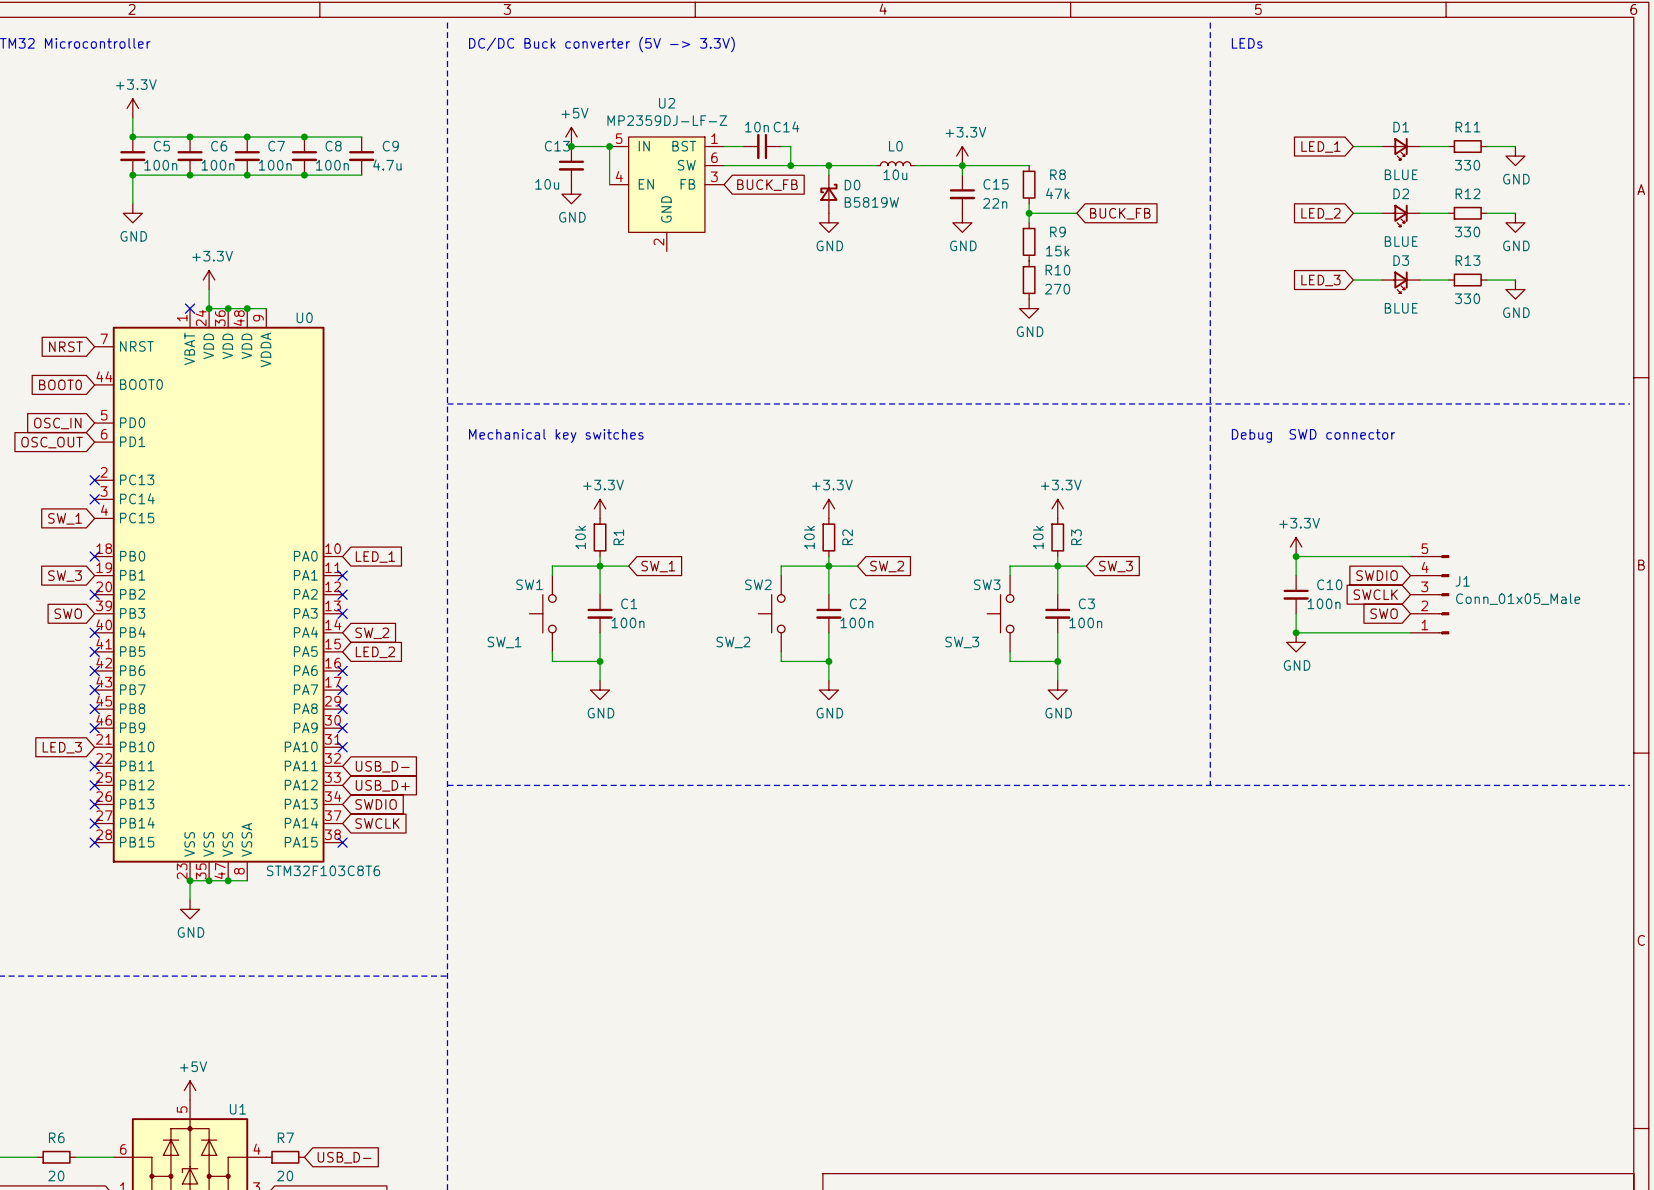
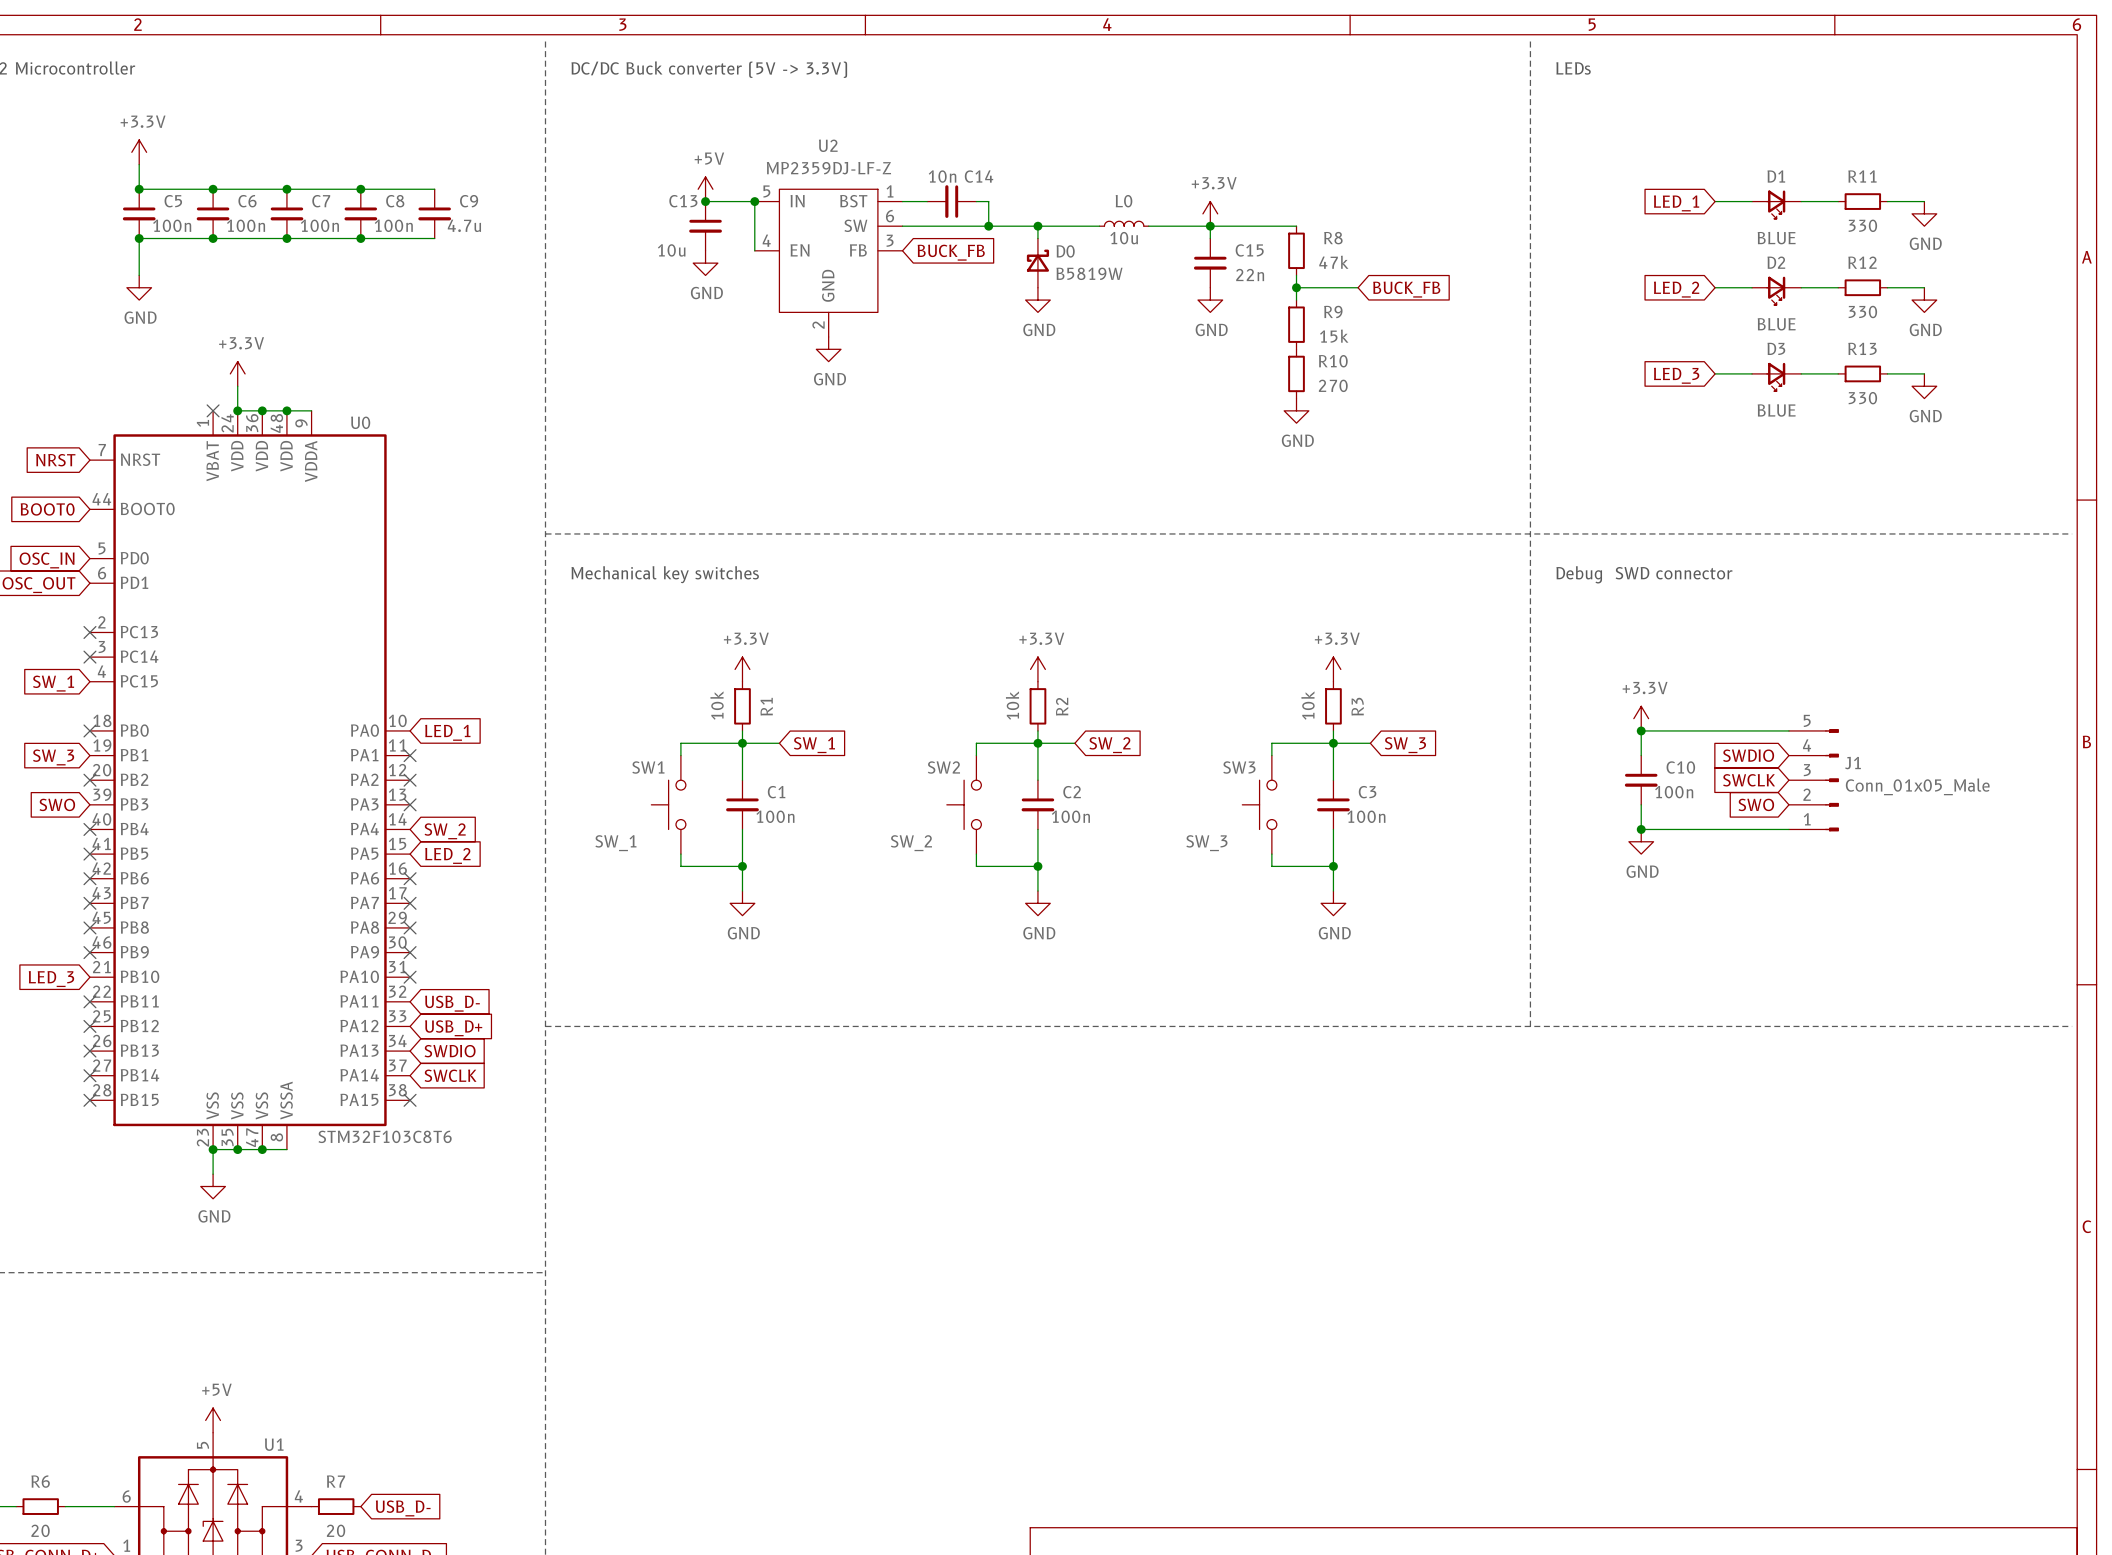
power symbol: none -> GND (828, 349)

